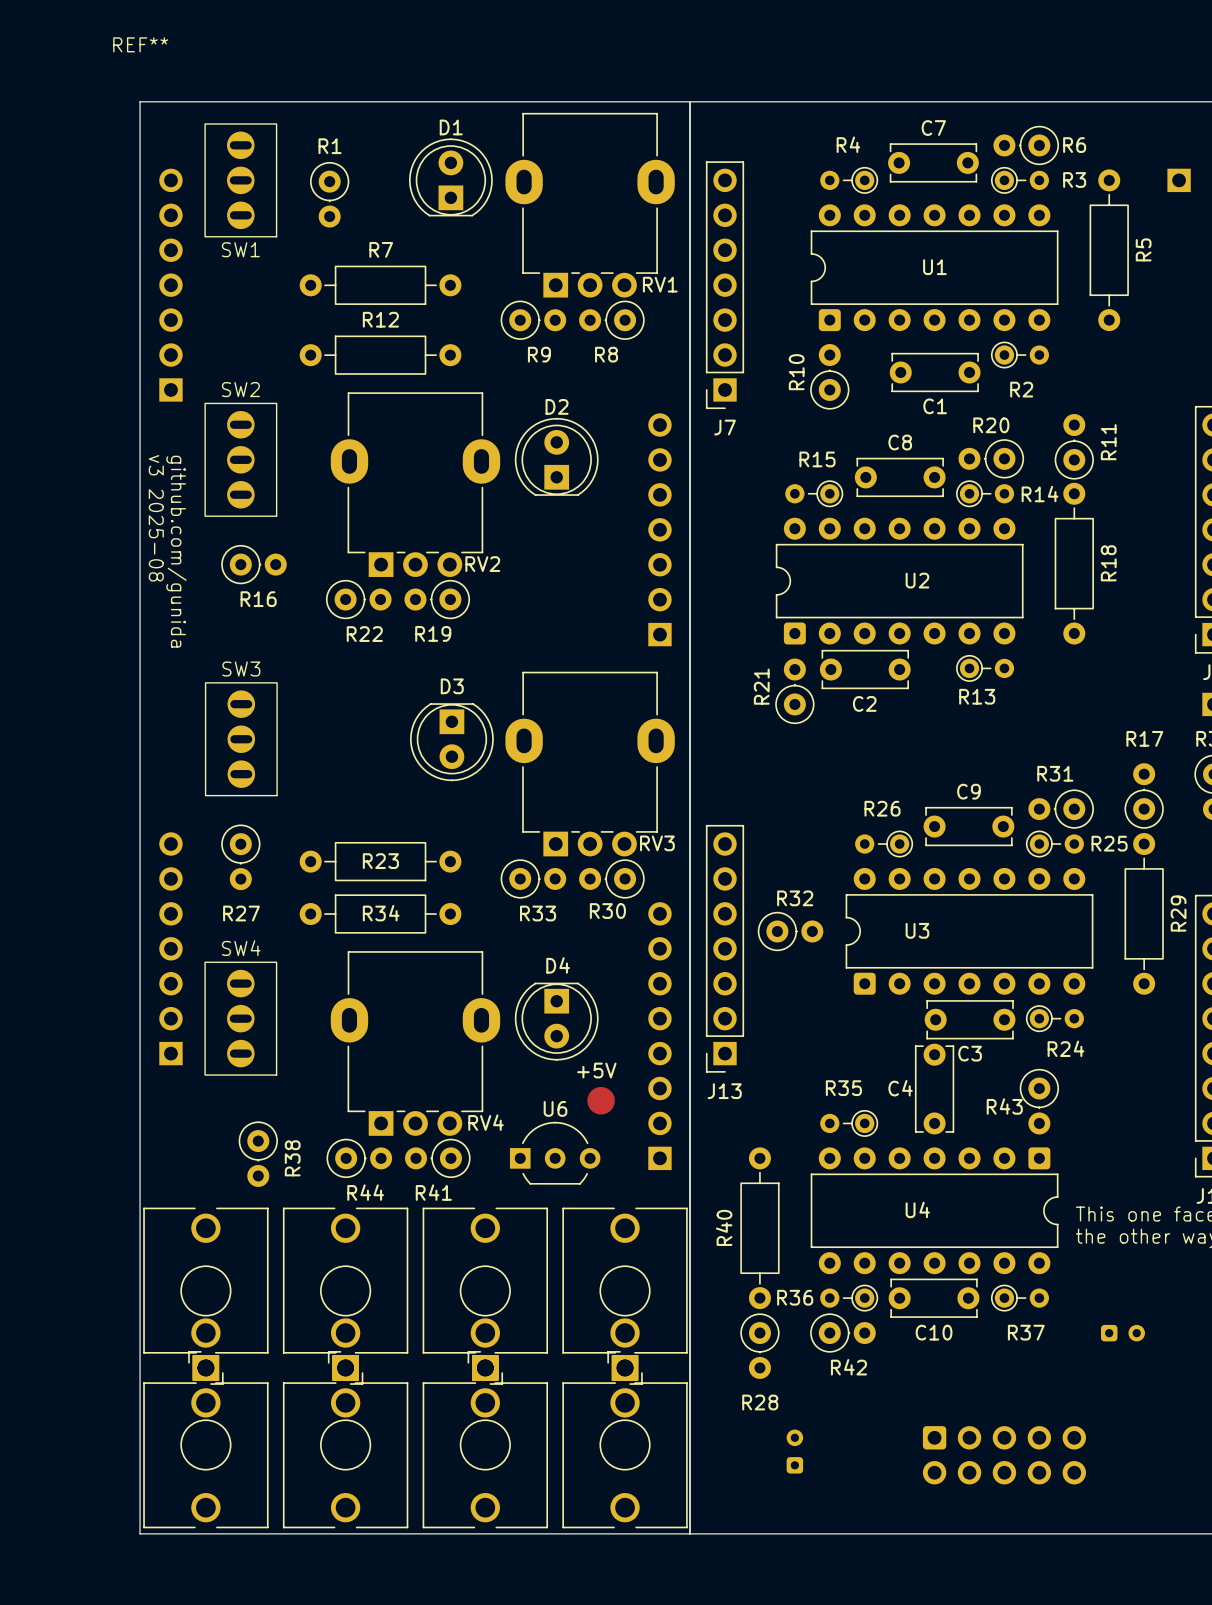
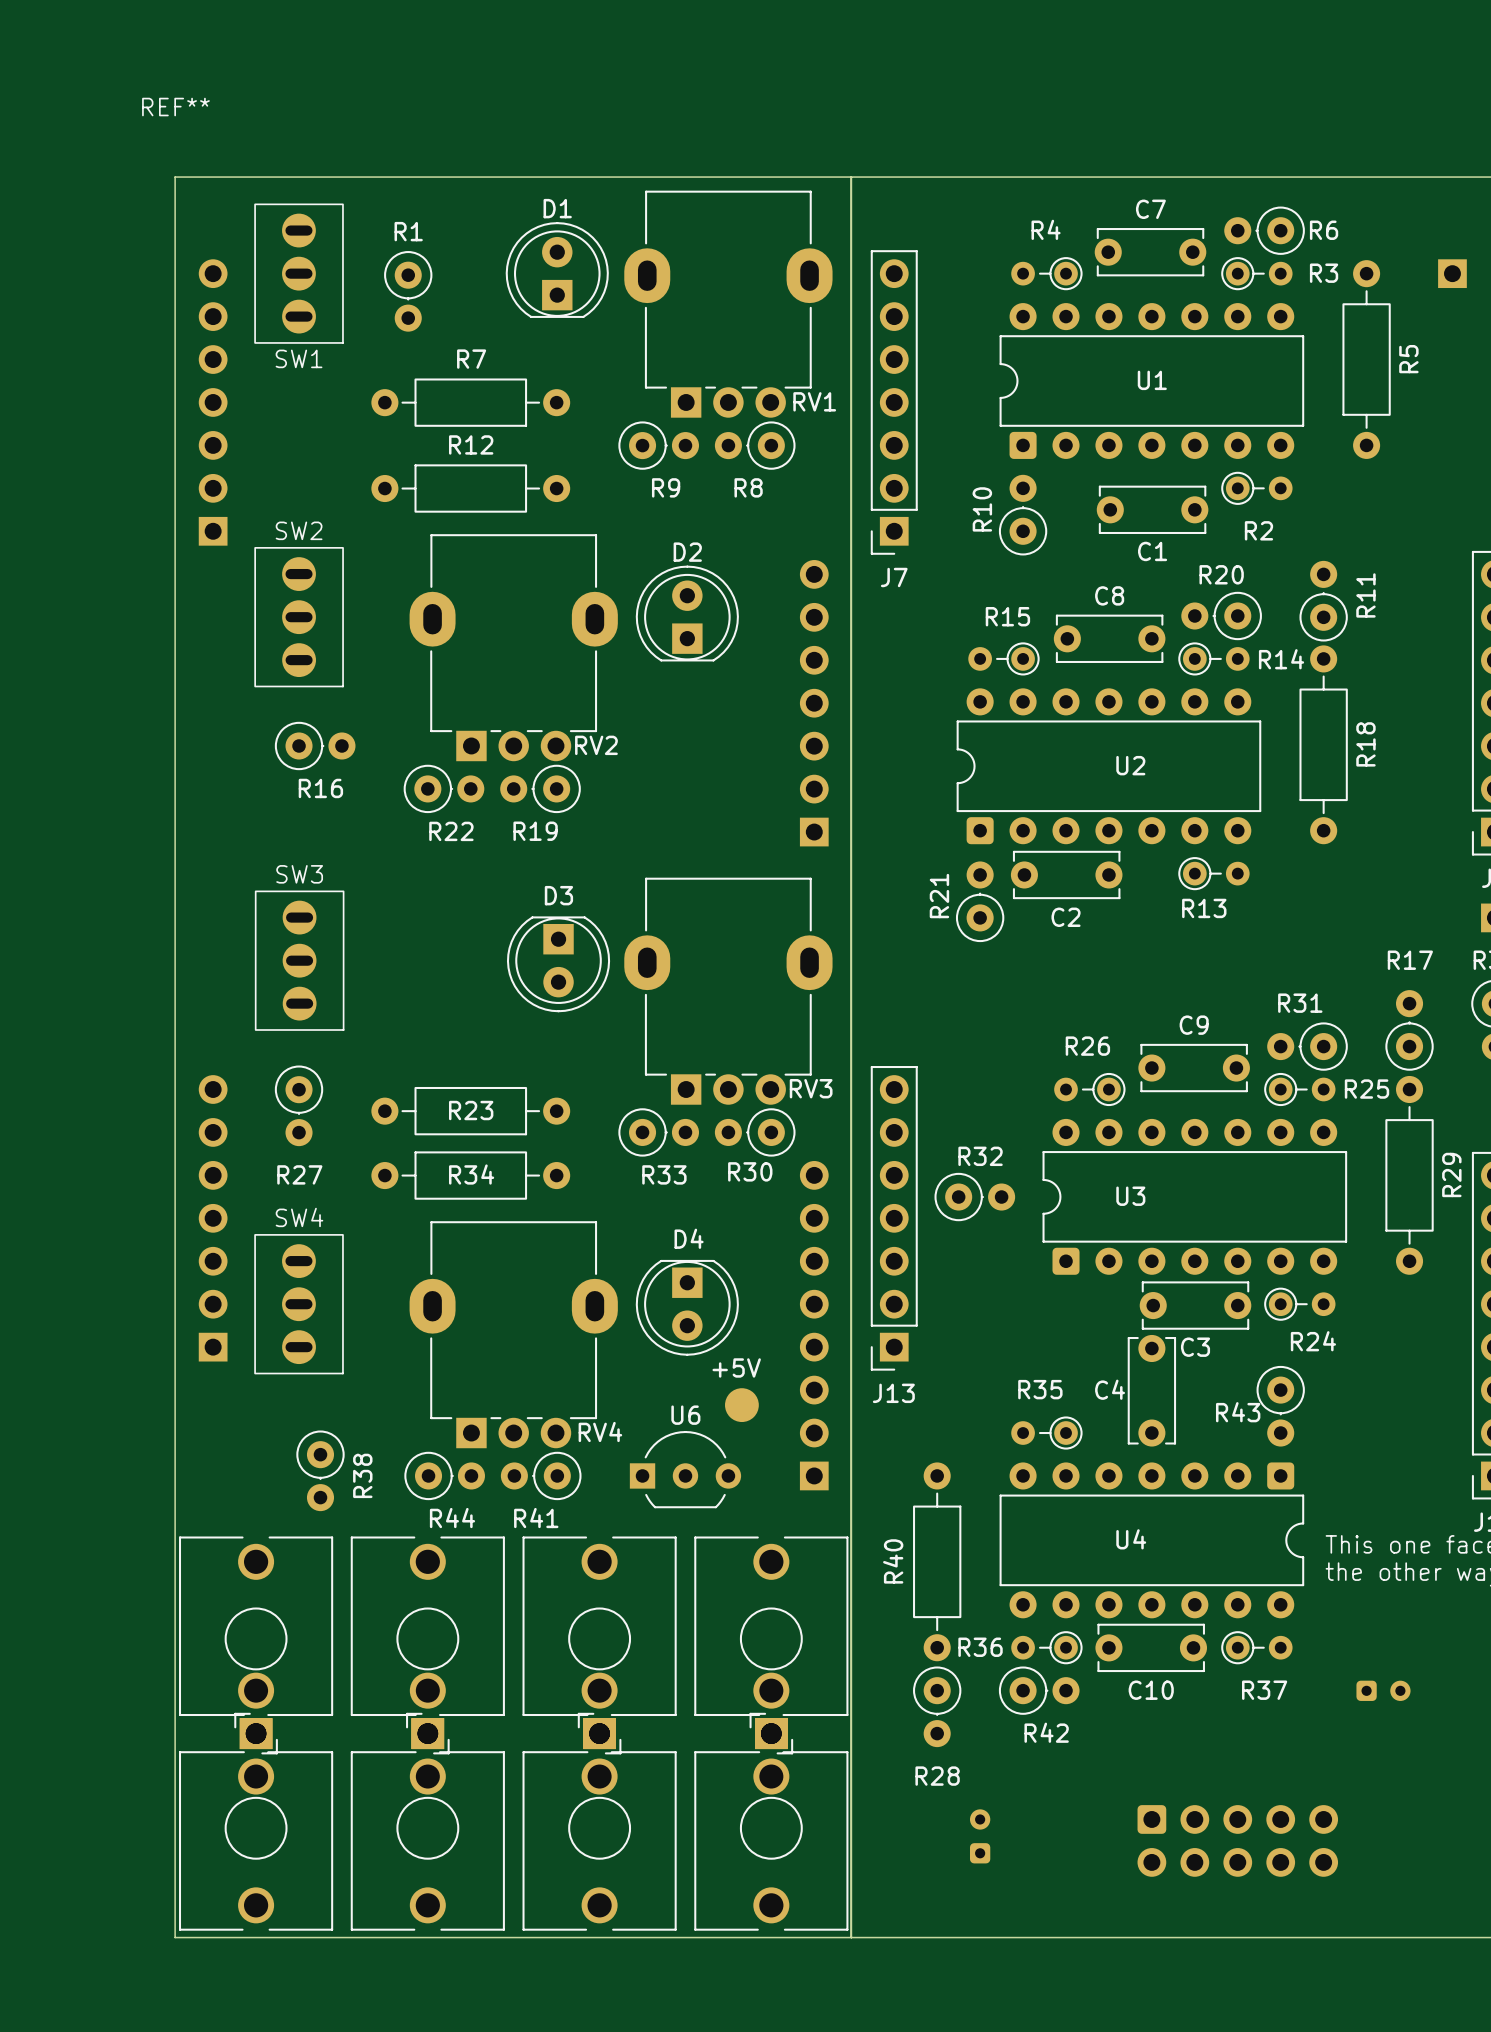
text: v3 2025-08 (156, 518) -> none
text: github.com/gunida (176, 551) -> none

